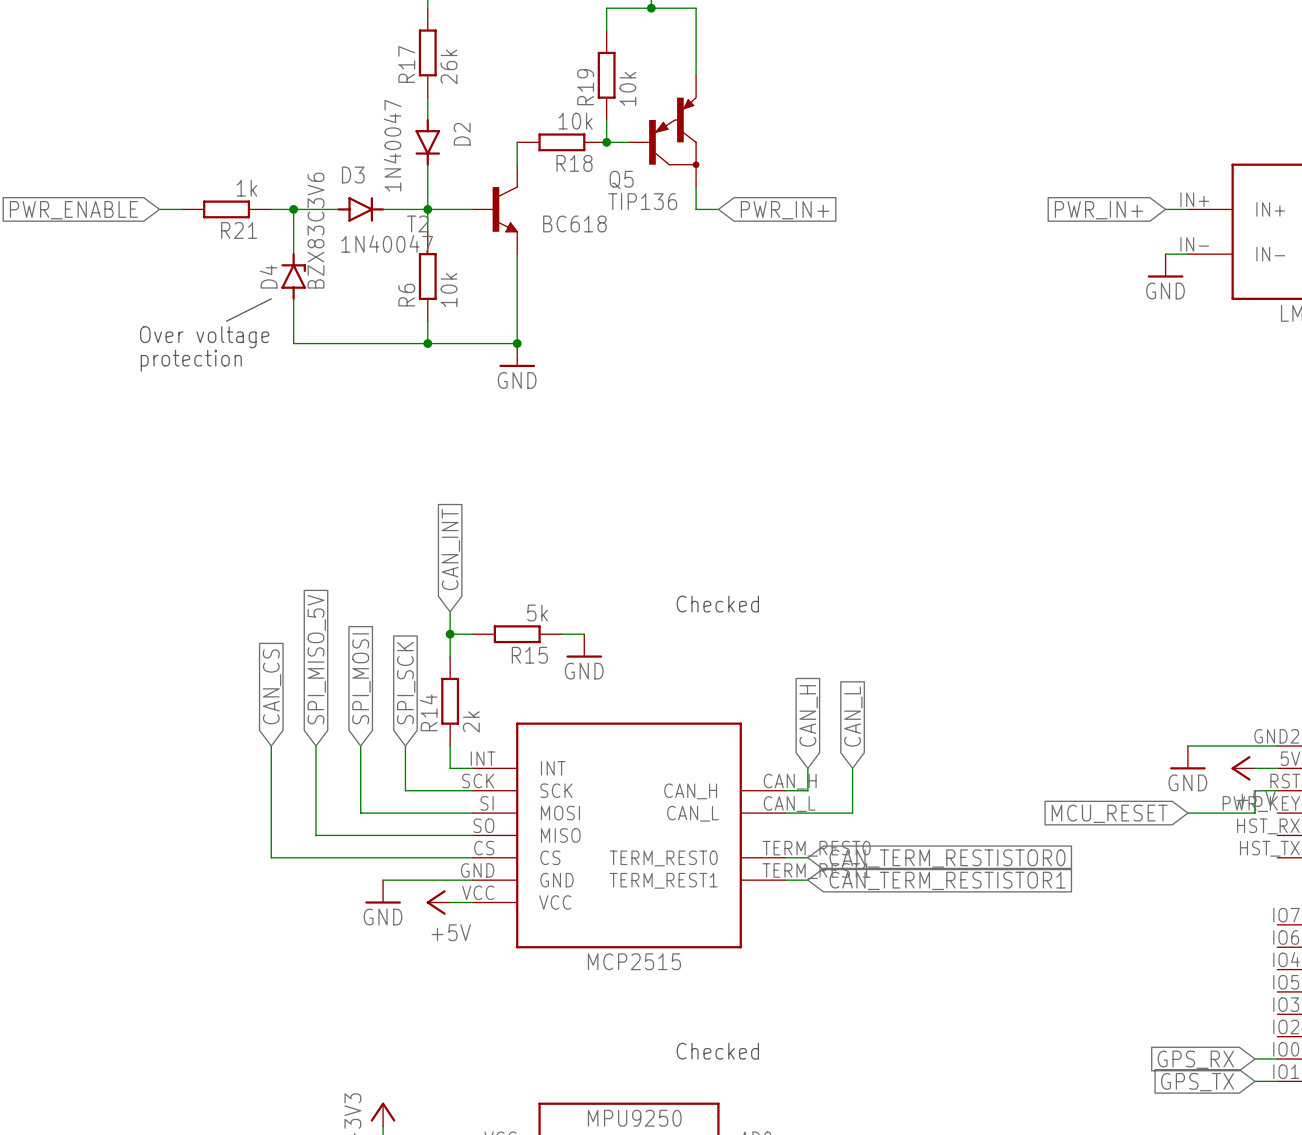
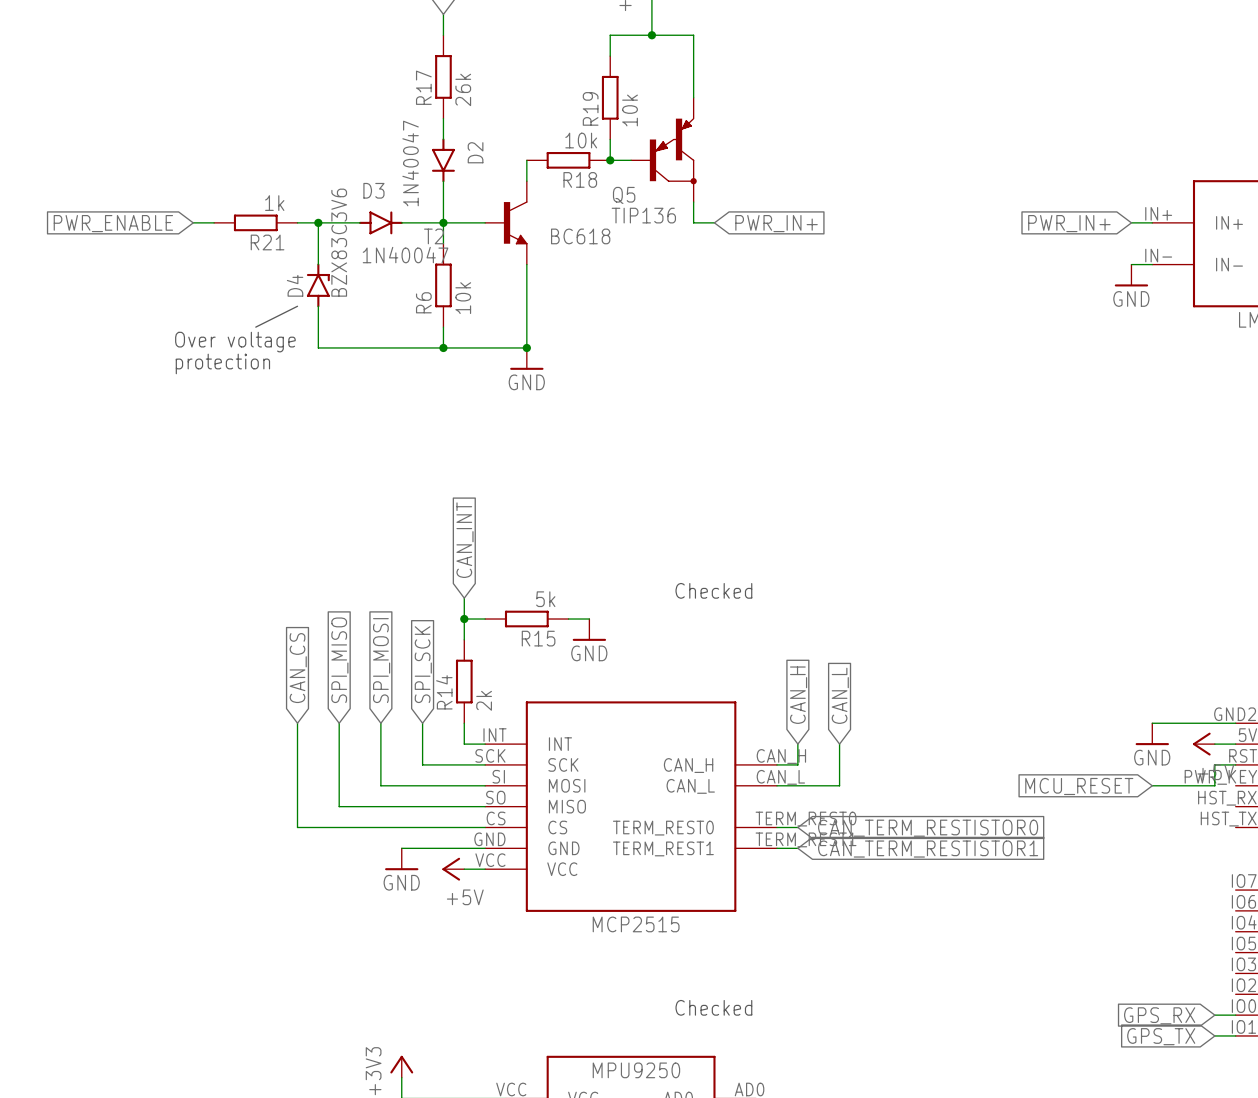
global label: SPI_MISO_5V (316, 659) -> SPI_MISO (339, 660)

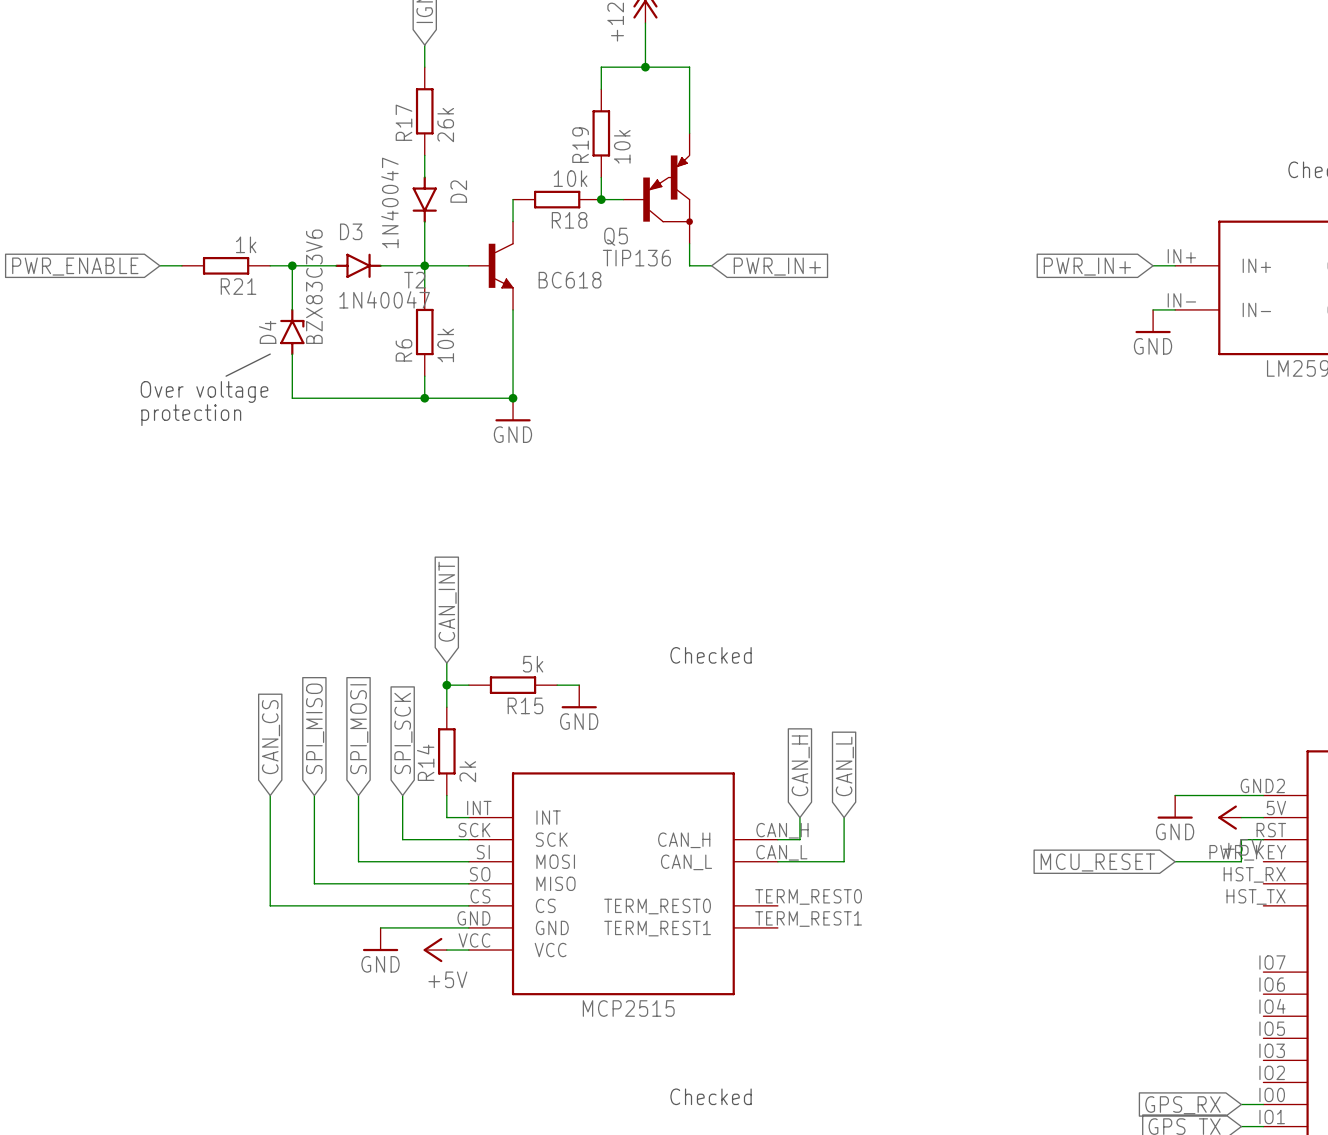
wire: (777, 827) (797, 827) -> none
global label: CAN_TERM_RESTISTOR0 (928, 828) -> none
wire: (777, 848) (797, 848) -> none
global label: CAN_TERM_RESTISTOR1 (928, 849) -> none

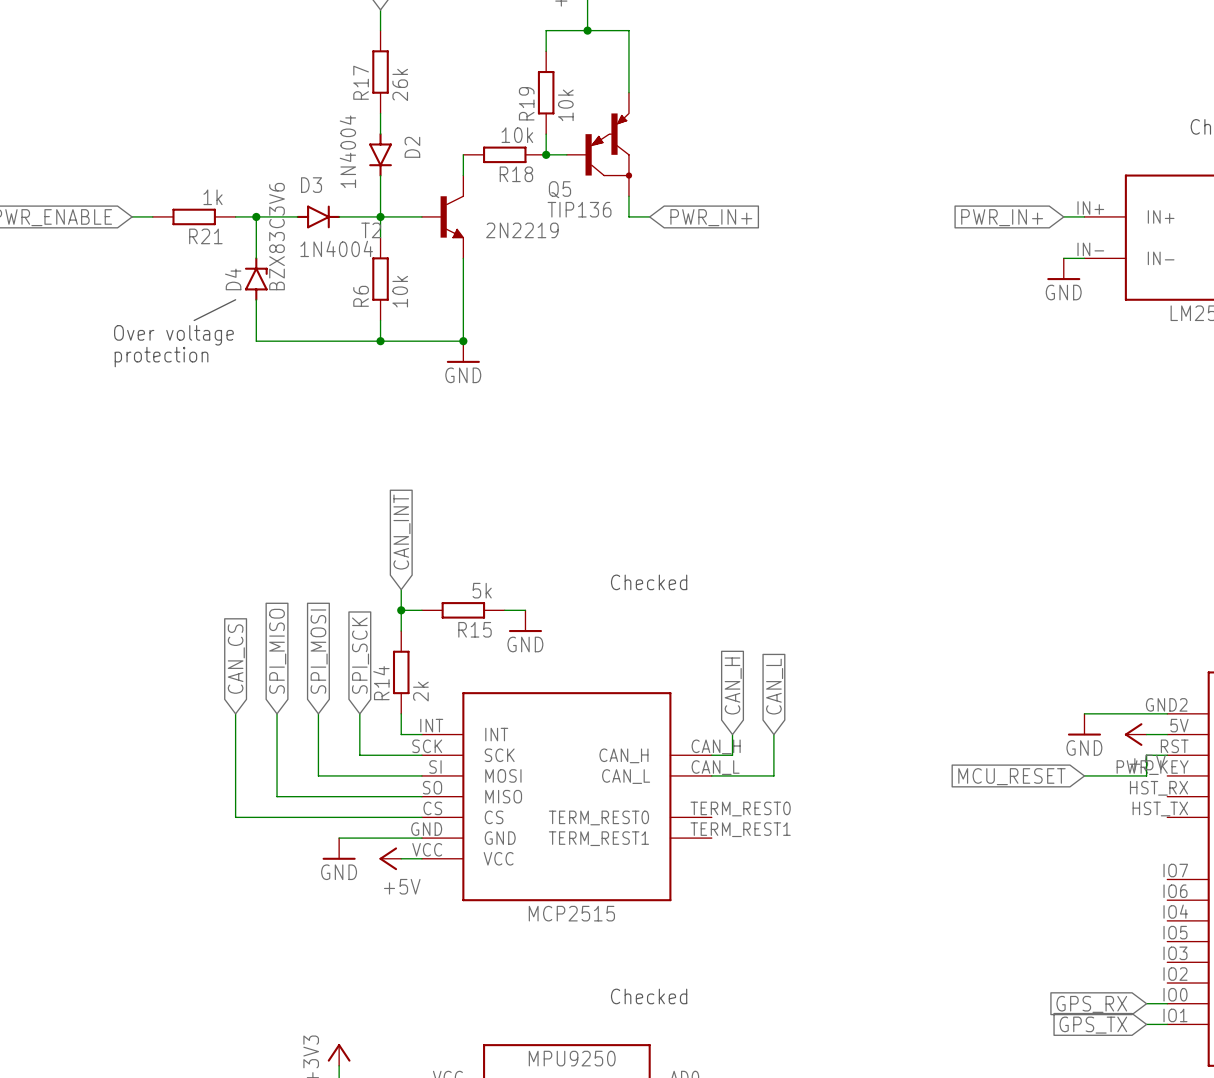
D2 value: 1N40047 (389, 202) -> 1N4004 (347, 151)
T2 value: BC618 (570, 280) -> 2N2219 (522, 230)
D3 value: 1N40047 (384, 299) -> 1N4004 (336, 248)

